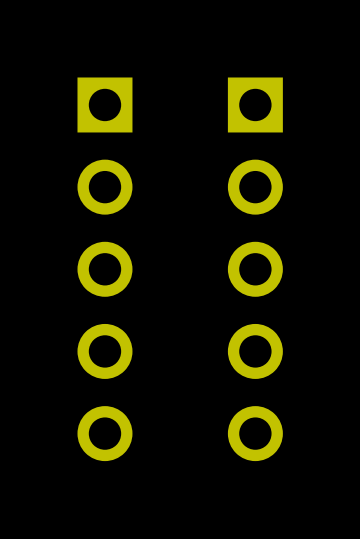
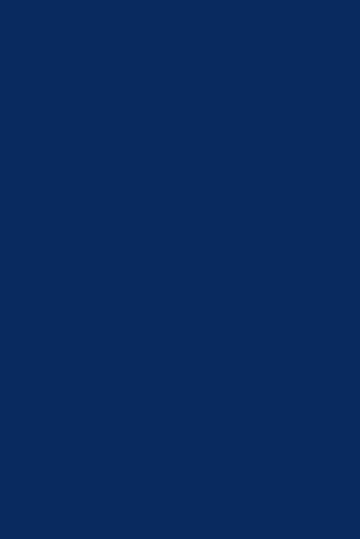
part: (104, 269) -> none
part: (255, 269) -> none

